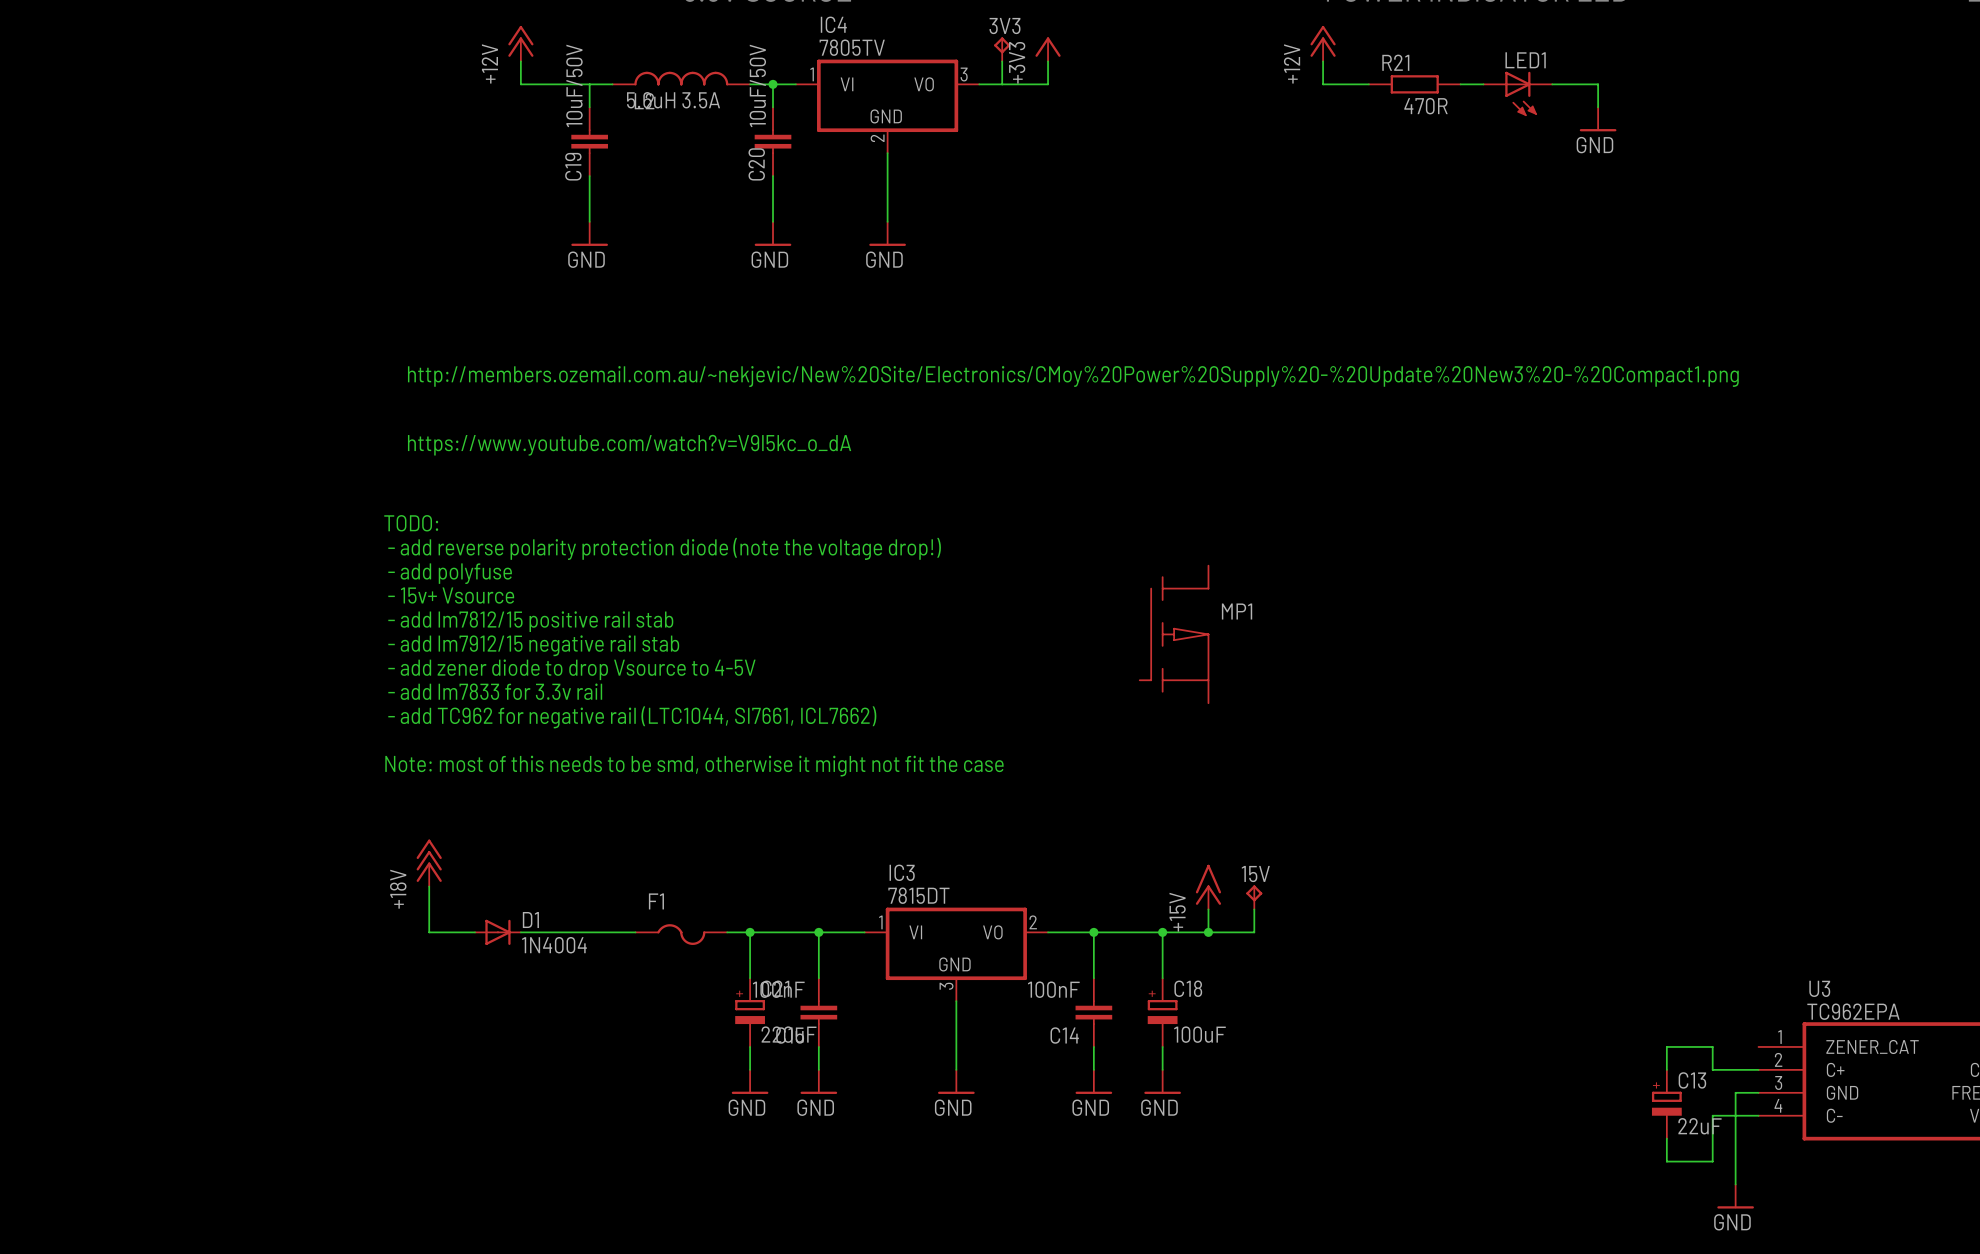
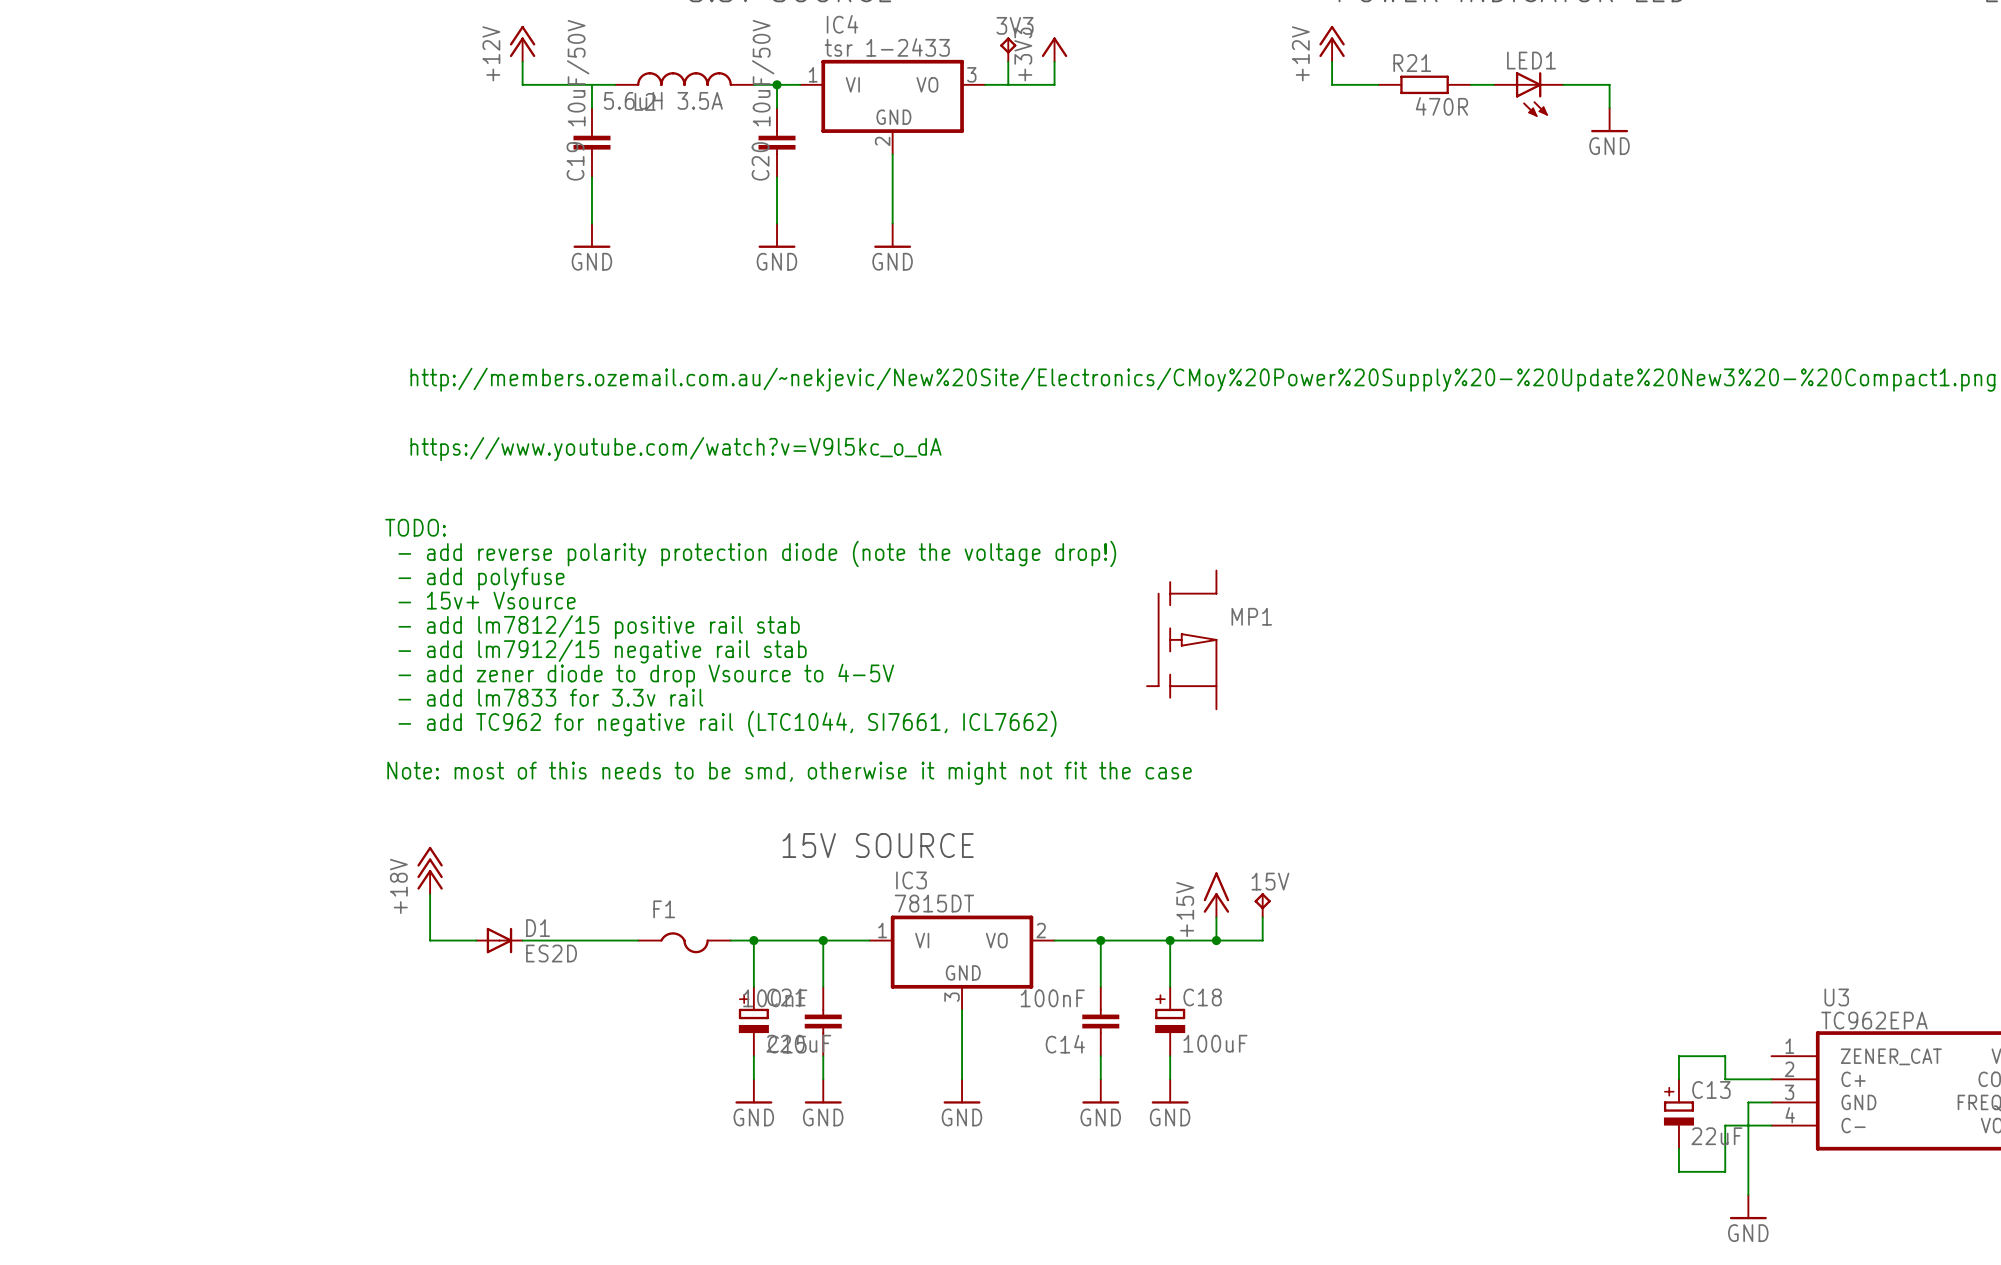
IC4 value: 7805TV (852, 47) -> tsr 1-2433 (887, 47)
text: none -> 15V SOURCE (878, 845)
D1 value: 1N4004 (554, 945) -> ES2D (551, 953)

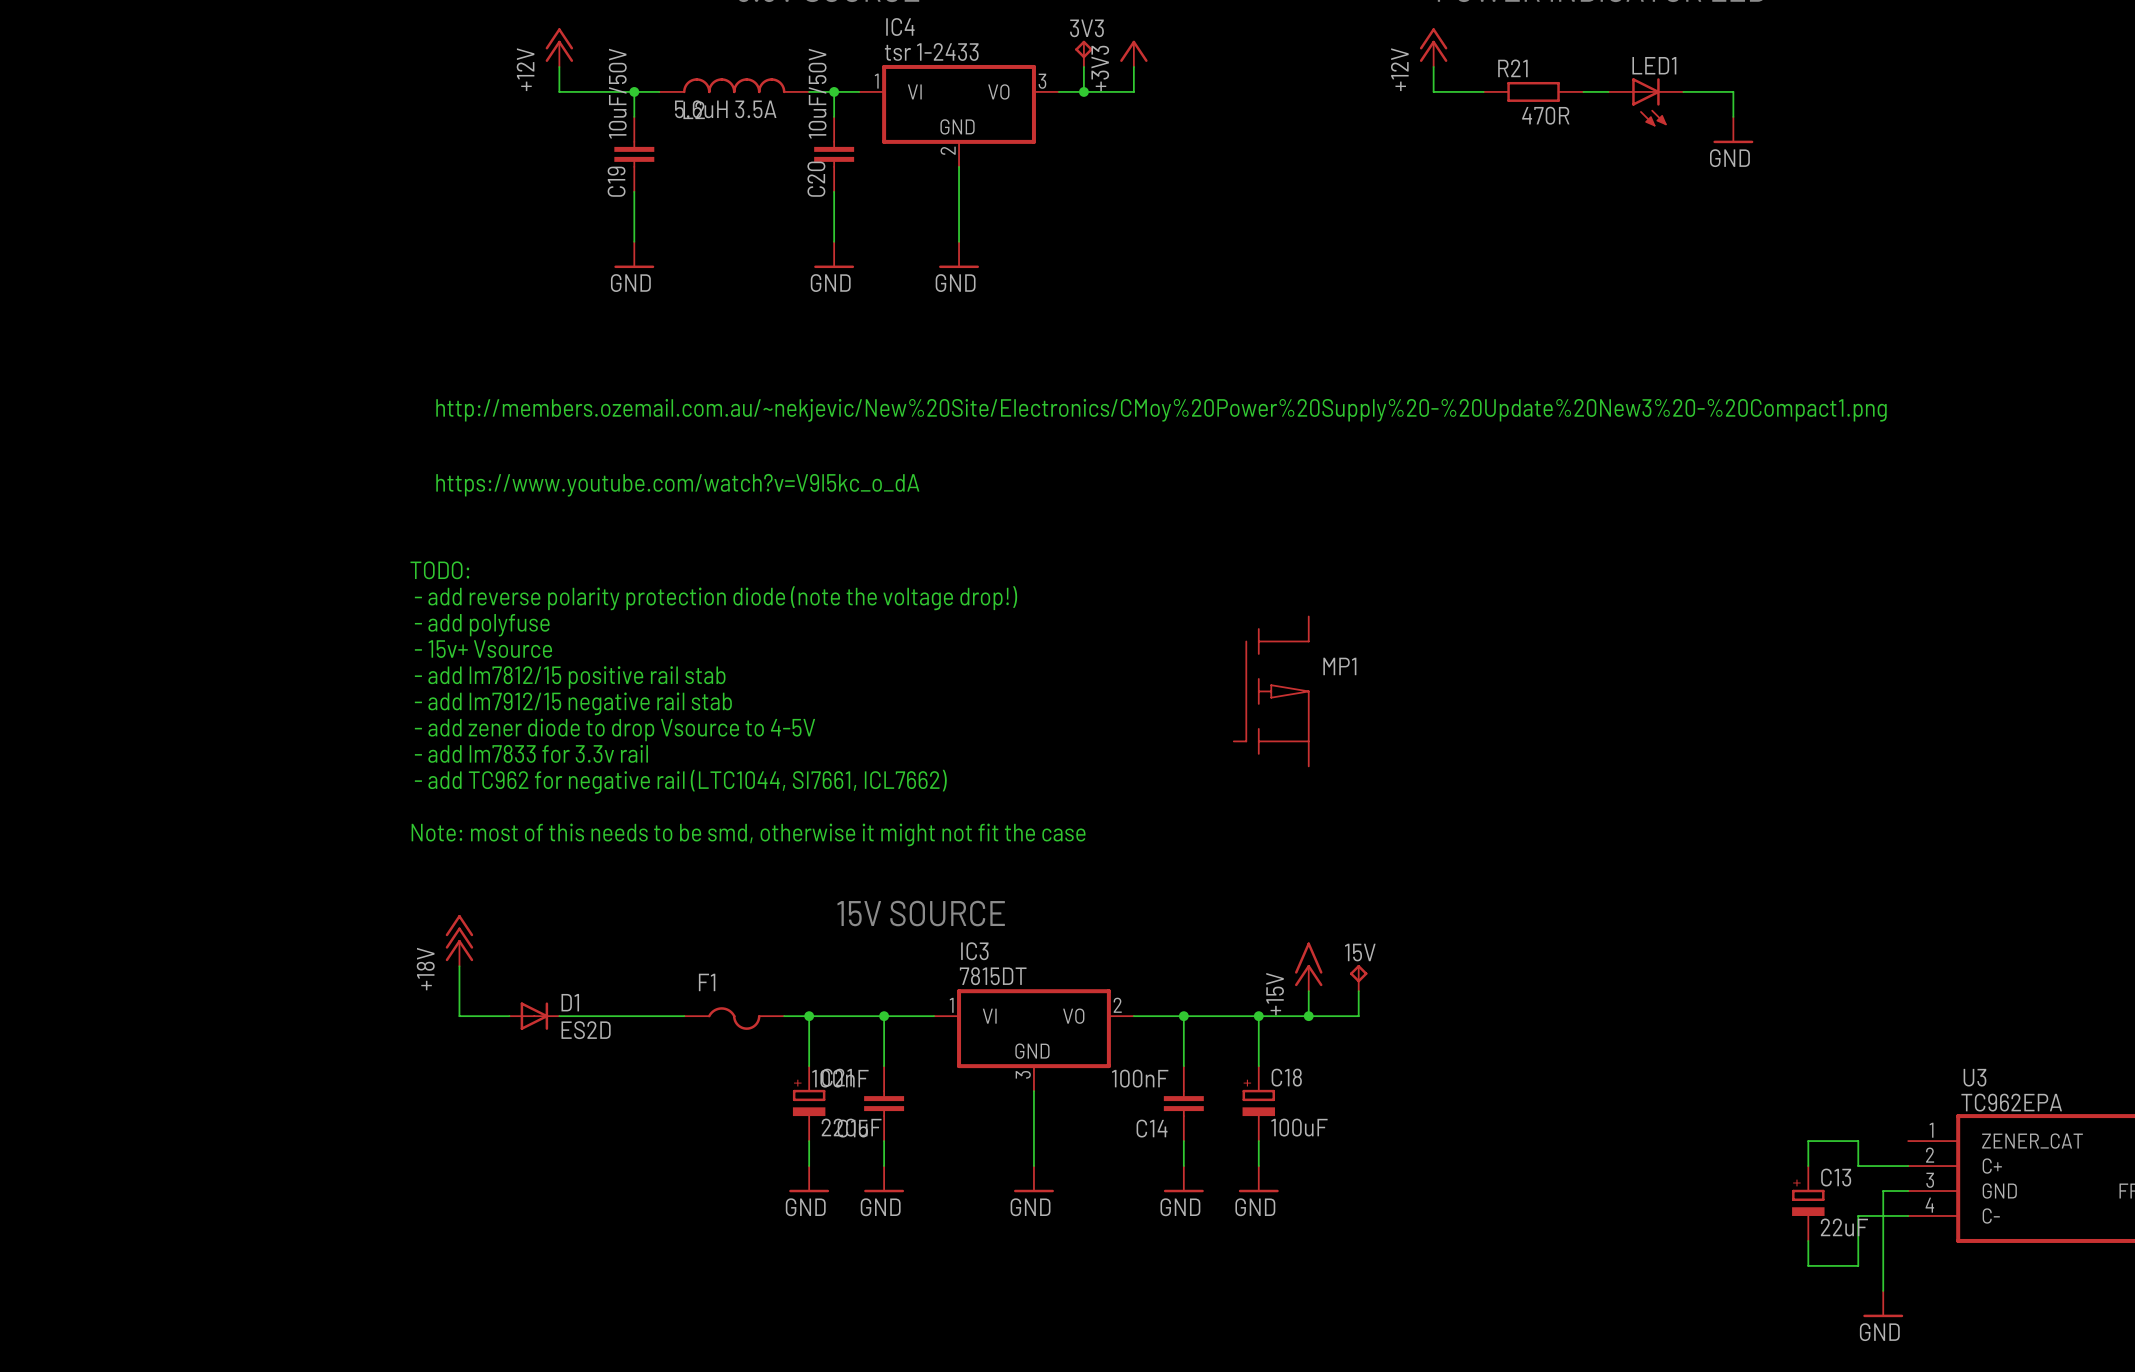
junction: none -> (634, 91)
junction: none -> (1083, 91)

